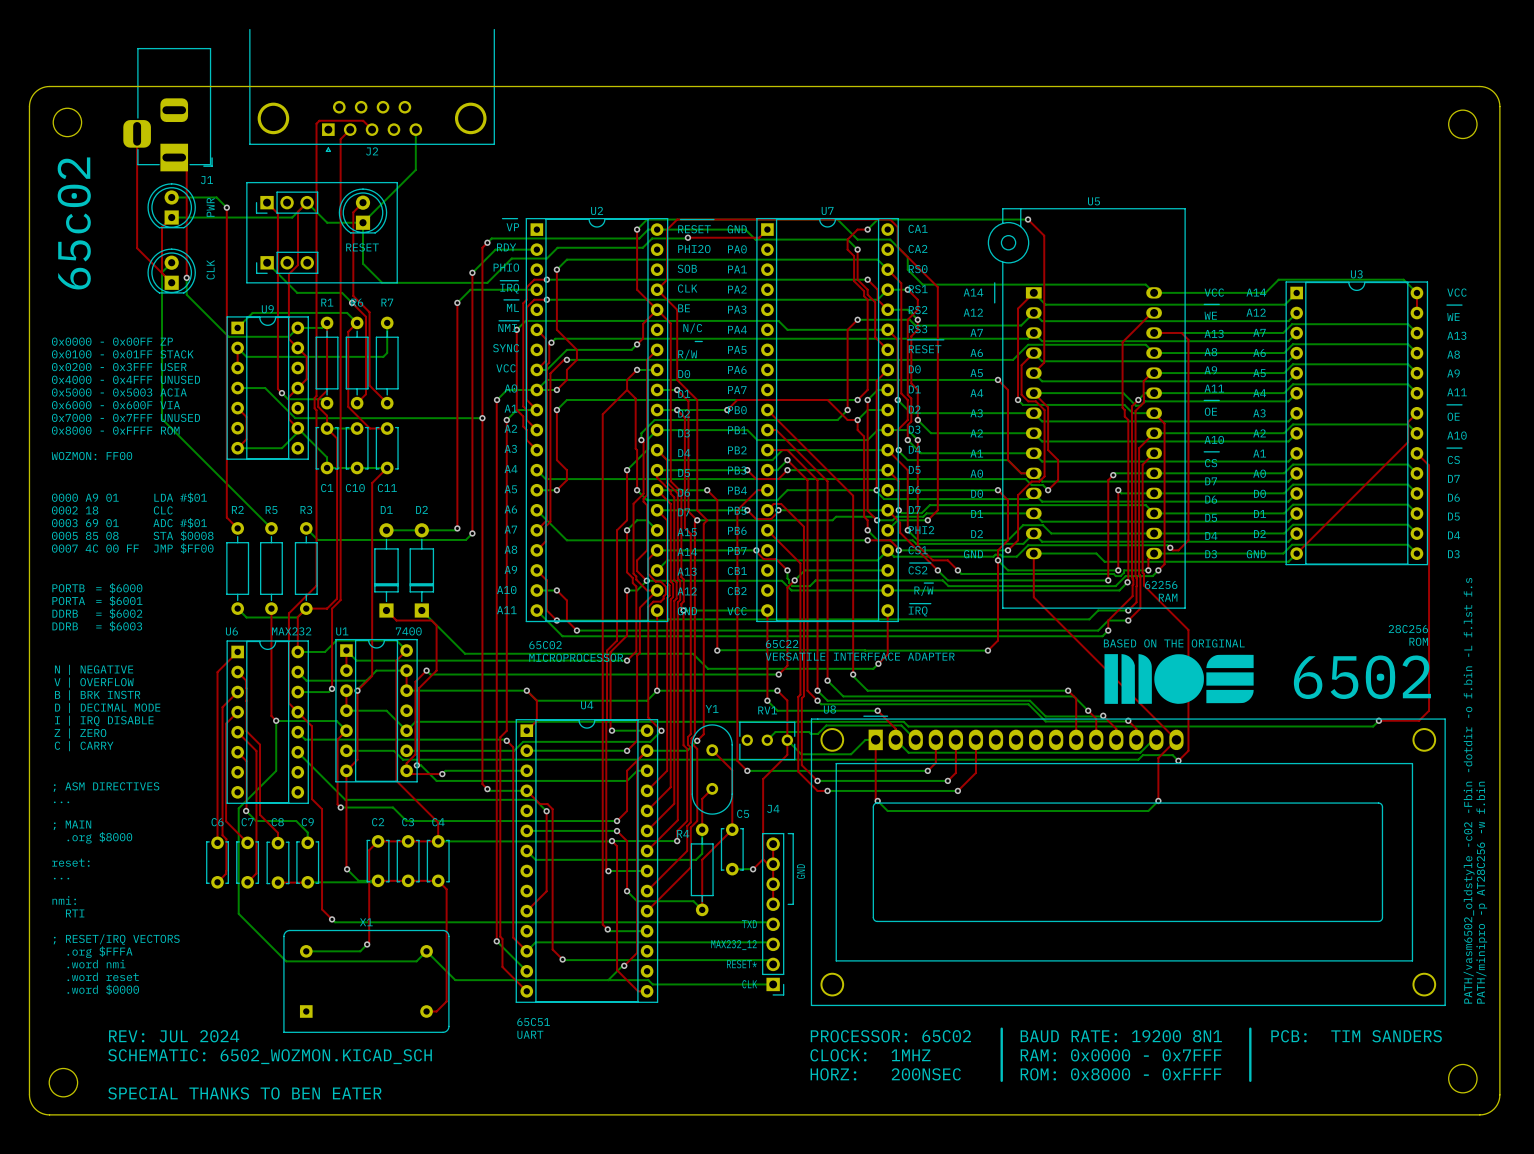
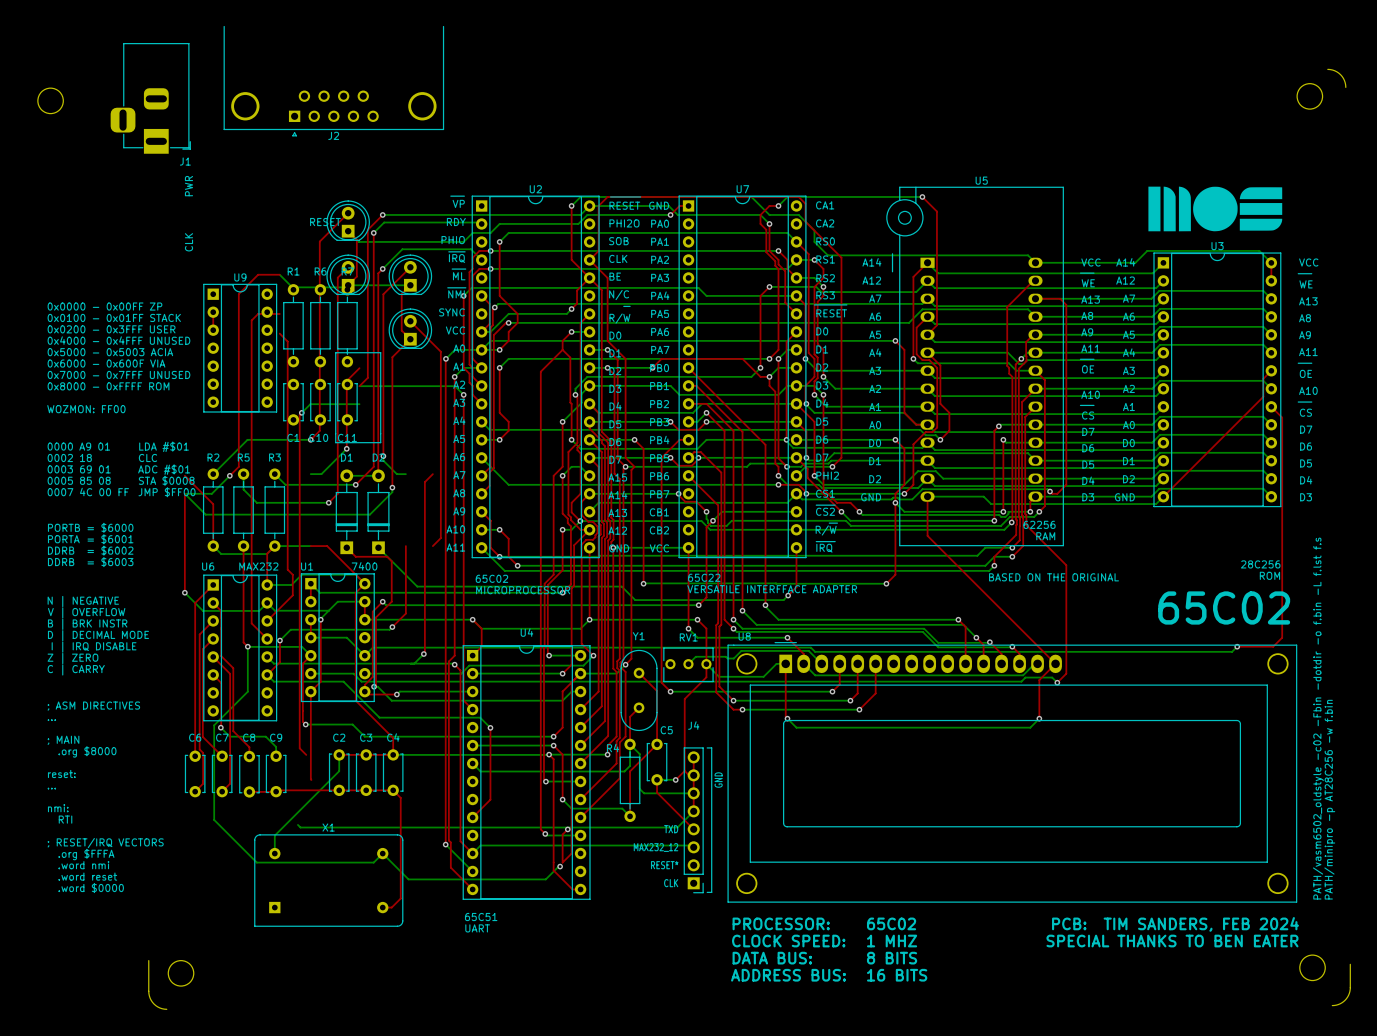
board edge: none -> (1327, 69) (1340, 74) (1345, 87)
board edge: (49, 86) (1479, 86) (1492, 90) (1498, 98) (1499, 106) (1499, 1094) (1495, 1107) (1489, 1112) (1479, 1114) (49, 1114) (38, 1111) (32, 1105) (29, 1094) (29, 106) (35, 92) (49, 86) -> none
round board edge position: (67, 122) -> (50, 100)
round board edge position: (1462, 124) -> (1309, 96)
top track: (350, 129) (340, 139) (340, 600) (332, 608) (332, 688) -> none
top track: (372, 129) (363, 120) (319, 120) (316, 123) (316, 396) (314, 397) (314, 408) (316, 410) (316, 585) (288, 613) (288, 703) -> (279, 313) (258, 313) (251, 320) (251, 623) (259, 630)
bottom track: (415, 129) (415, 169) (362, 222) -> none
top track: (137, 133) (137, 248) (171, 282) -> none
top track: (174, 157) (186, 170) (186, 277) -> none
line: (246, 182) (397, 182) (397, 282) (246, 282) (246, 182) -> none
bottom track: (171, 197) (216, 197) (226, 207) -> none
top track: (267, 202) (277, 213) (277, 389) (281, 393) -> none
part: (287, 202) -> none
top track: (307, 202) (297, 211) (297, 265) (288, 274) (288, 339) (306, 356) (306, 379) (288, 396) (288, 419) (297, 428) -> none
top track: (362, 202) (353, 212) (353, 296) (369, 312) (369, 385) (387, 403) -> none
part: (171, 205) -> none
top track: (226, 207) (226, 517) (237, 528) -> none
via: (226, 207) -> none
drawing: none -> [1148, 186, 1283, 232]
part position: (362, 211) -> (348, 220)
top track: (171, 217) (162, 227) (162, 273) -> none
bottom track: (171, 217) (292, 217) (307, 202) (327, 222) (362, 222) -> none
bottom track: (362, 222) (362, 263) (382, 282) (487, 282) (511, 258) (546, 258) (557, 247) (642, 247) (652, 238) (687, 237) -> none
text: 65c02 (74, 223) -> none
bottom track: (657, 229) (648, 229) (639, 238) (491, 238) (487, 242) -> (589, 206) (580, 214) (382, 214)
top track: (767, 229) (759, 237) (687, 237) -> (688, 205) (679, 205) (670, 214)
top track: none -> (348, 213) (319, 241) (319, 430) (310, 439)
via: (687, 237) -> none
top track: none -> (382, 214) (367, 229) (367, 377) (359, 386)
via: none -> (382, 214)
bottom track: none -> (670, 214) (587, 214) (578, 223) (499, 223) (490, 232) (472, 232) (463, 241) (358, 241) (348, 231)
via: none -> (670, 214)
top track: (487, 242) (482, 247) (482, 784) (487, 789) -> none
via: (487, 242) -> none
bottom track: (536, 249) (495, 249) (472, 272) -> (481, 224) (384, 222) (373, 232)
top track: none -> (348, 231) (356, 239) (356, 276) (348, 285)
top track: none -> (373, 232) (373, 466) (355, 484)
via: none -> (373, 232)
bottom track: (171, 262) (162, 272) (162, 418) (271, 528) -> (328, 502) (256, 502) (243, 489) (243, 474)
bottom track: (267, 262) (297, 292) (342, 292) (352, 302) -> none
part: (287, 262) -> none
part: (171, 271) -> none
top track: (472, 272) (472, 533) -> none
via: (472, 272) -> none
bottom track: (186, 277) (186, 294) (228, 336) (288, 336) (297, 327) (322, 327) (327, 322) -> none
via: (186, 277) -> none
bottom track: (536, 289) (470, 289) (457, 302) -> (481, 259) (470, 249) (402, 249) (382, 268)
top track: none -> (348, 267) (337, 277) (337, 493) (328, 502)
top track: none -> (410, 267) (383, 294) (383, 456)
top track: none -> (382, 268) (378, 273) (378, 475)
via: none -> (382, 268)
top track: (352, 302) (366, 316) (366, 394) (357, 403) -> none
via: (352, 302) -> none
top track: (457, 302) (457, 528) -> none
via: (457, 302) -> none
top track: none -> (279, 274) (258, 274) (238, 294) (238, 466) (229, 475)
bottom track: none -> (279, 274) (292, 287) (348, 287)
part: none -> (348, 274)
part: none -> (410, 274)
bottom track: none -> (348, 285) (410, 285)
top track: none -> (410, 285) (401, 293) (401, 330) (410, 339) (392, 357) (392, 487)
top track: (327, 322) (327, 390) (318, 399) (318, 406) (327, 415) (327, 428) (337, 438) (337, 598) (327, 608) -> none
top track: (357, 322) (348, 331) (348, 406) (369, 428) (387, 428) -> none
bottom track: (357, 322) (347, 312) (252, 312) (237, 327) -> none
bottom track: (387, 322) (387, 353) (383, 356) (246, 356) (237, 347) -> none
top track: none -> (410, 321) (440, 351) (440, 538) (432, 546)
part: none -> (410, 328)
top track: none -> (279, 333) (287, 341) (287, 569) (292, 574) (292, 595) (267, 620)
bottom track: (237, 388) (265, 388) (295, 418) (482, 418) -> none
bottom track: (281, 393) (288, 399) (323, 399) (327, 403) -> none
via: (281, 393) -> none
line: none -> (335, 352) (335, 442) (380, 442) (380, 352) (335, 352)
top track: (237, 408) (246, 416) (246, 439) (237, 448) -> none
top track: none -> (359, 368) (346, 380) (346, 448)
via position: (482, 418) -> (463, 394)
bottom track: (327, 428) (357, 428) -> none
bottom track: none -> (359, 386) (455, 386) (463, 394)
top track: none -> (463, 394) (463, 700)
bottom track: (237, 448) (281, 448) (297, 432) (297, 428) (327, 457) (327, 467) (387, 467) -> none
bottom track: none -> (359, 404) (310, 404) (301, 412)
top track: none -> (301, 412) (299, 414) (299, 748) (306, 754)
via: none -> (301, 412)
top track: (387, 467) (372, 483) (372, 676) (357, 690) -> none
bottom track: none -> (310, 439) (247, 439) (213, 474)
via: none -> (310, 439)
bottom track: none -> (346, 448) (321, 474) (310, 474)
via: none -> (346, 448)
bottom track: none -> (383, 456) (383, 460) (396, 474) (405, 474)
via: none -> (383, 456)
bottom track: (457, 528) (455, 530) (421, 530) -> none
via: (457, 528) -> none
top track: none -> (432, 474) (424, 482) (423, 654)
top track: none -> (184, 475) (213, 504) (213, 546)
bottom track: none -> (229, 475) (211, 493) (184, 493) (205, 514) (369, 514) (392, 492) (392, 487)
via: none -> (229, 475)
bottom track: (472, 533) (465, 539) (317, 539) -> (355, 484) (285, 484)
via: (472, 533) -> none
via: none -> (355, 484)
via: none -> (392, 487)
top track: none -> (184, 493) (184, 592)
via: none -> (328, 502)
top track: (306, 608) (327, 608) -> none
bottom track: none -> (274, 546) (310, 546)
top track: none -> (310, 546) (327, 546) (364, 583)
top track: none -> (405, 546) (405, 613) (392, 627)
drawing: [1104, 654, 1254, 704] -> none
bottom track: none -> (184, 592) (203, 610) (259, 610) (267, 602)
via: none -> (184, 592)
text: 6502 (1362, 677) -> 65C02 (1224, 607)
bottom track: (332, 688) (328, 692) (297, 692) -> none
via position: (332, 688) -> (279, 640)
bottom track: none -> (392, 627) (389, 629) (290, 629) (279, 640)
via: none -> (392, 627)
top track: (297, 712) (312, 726) -> (279, 640) (279, 651)
bottom track: none -> (423, 654) (414, 663)
via: none -> (423, 654)
top track: (312, 738) (312, 799) (322, 809) (322, 909) (332, 919) -> (279, 662) (267, 674)
bottom track: (305, 759) (345, 799) (423, 799) -> (273, 681) (343, 681) (379, 717)
bottom track: (487, 789) (489, 790) (526, 790) -> none
via: (487, 789) -> none
top track: (526, 790) (540, 804) (547, 804) (552, 809) (552, 949) (562, 959) -> (472, 709) (463, 700)
bottom track: none -> (630, 744) (639, 754) (639, 788) (644, 793) (693, 793)
top track: (378, 841) (369, 850) (369, 942) (367, 944) -> none
bottom track: (347, 869) (358, 880) (378, 880) (307, 882) -> none
via: (347, 869) -> none
top track: none -> (657, 779) (657, 792) (693, 829)
top track: none -> (339, 790) (276, 791)
line: (788, 904) (793, 904) -> (707, 892) (711, 892) (711, 811)
via: (332, 919) -> none
bottom track: (755, 922) (771, 922) (773, 924) -> (677, 827) (693, 811)
via: none -> (567, 829)
bottom track: (367, 944) (360, 951) (306, 951) -> (339, 754) (339, 771) (274, 835) (274, 853)
via: (367, 944) -> none
top track: (637, 951) (624, 965) -> (571, 853) (562, 862) (562, 834) (567, 829)
bottom track: (562, 959) (768, 960) (773, 964) -> none
via: (562, 959) -> none
bottom track: (608, 980) (648, 980) (652, 984) (773, 984) -> none
line: (1001, 1028) (1001, 1080) -> none
line: (1250, 1028) (1250, 1080) -> none
text: none -> 65C02 (891, 923)
text: REV: JUL 2024 (174, 1036) -> none
text: PROCESSOR: 65C02 (890, 1036) -> PROCESSOR: (781, 923)
text: BAUD RATE: 19200 8N1 (1121, 1036) -> none
text: PCB: TIM SANDERS (1356, 1036) -> PCB: TIM SANDERS, FEB 2024 (1175, 924)
text: none -> CLOCK SPEED: (788, 941)
text: none -> 1 MHZ (892, 941)
text: none -> SPECIAL THANKS TO BEN EATER (1172, 941)
text: CLOCK: 1MHZ (870, 1055) -> none
text: RAM: 0x0000 - 0x7FFF (1121, 1055) -> none
text: SCHEMATIC: 6502_WOZMON.KICAD_SCH (270, 1056) -> none
text: none -> DATA BUS: (772, 958)
text: none -> 8 BITS (892, 958)
board edge: none -> (148, 960) (150, 998) (157, 1006) (166, 1009)
text: HORZ: 200NSEC (885, 1074) -> none
text: ROM: 0x8000 - 0xFFFF (1121, 1074) -> none
board edge: none -> (1350, 964) (1348, 995) (1341, 1002) (1332, 1005)
round board edge position: (63, 1082) -> (181, 973)
text: none -> ADDRESS BUS: (788, 975)
text: none -> 16 BITS (897, 975)
text: SPECIAL THANKS TO BEN EATER (244, 1093) -> none

